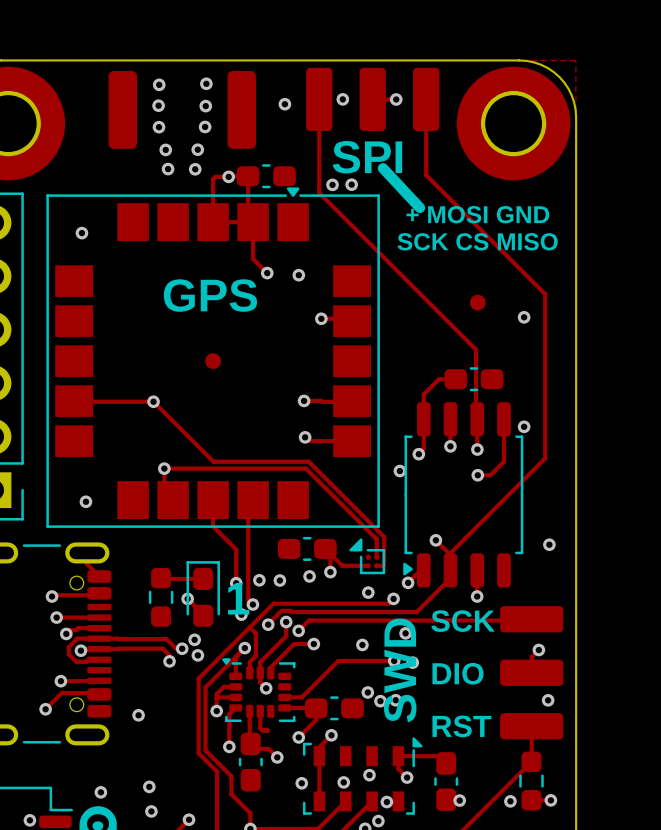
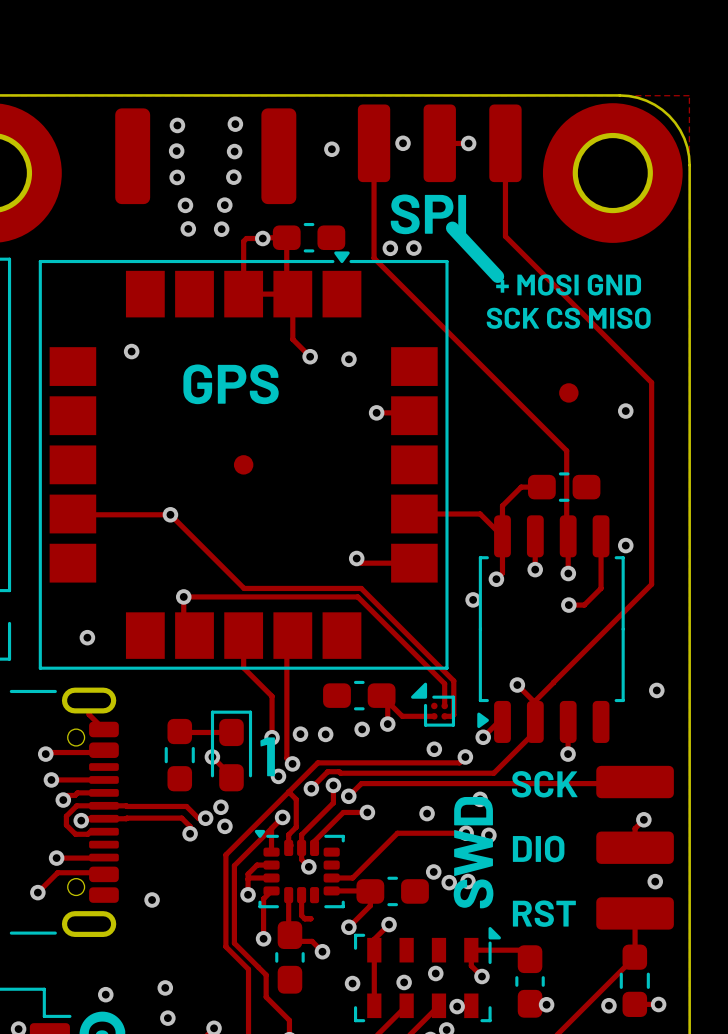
via position: (81, 233) -> (131, 351)
track: (304, 400) (352, 401) -> (502, 536) (480, 514) (414, 514)
via: (304, 400) -> none

